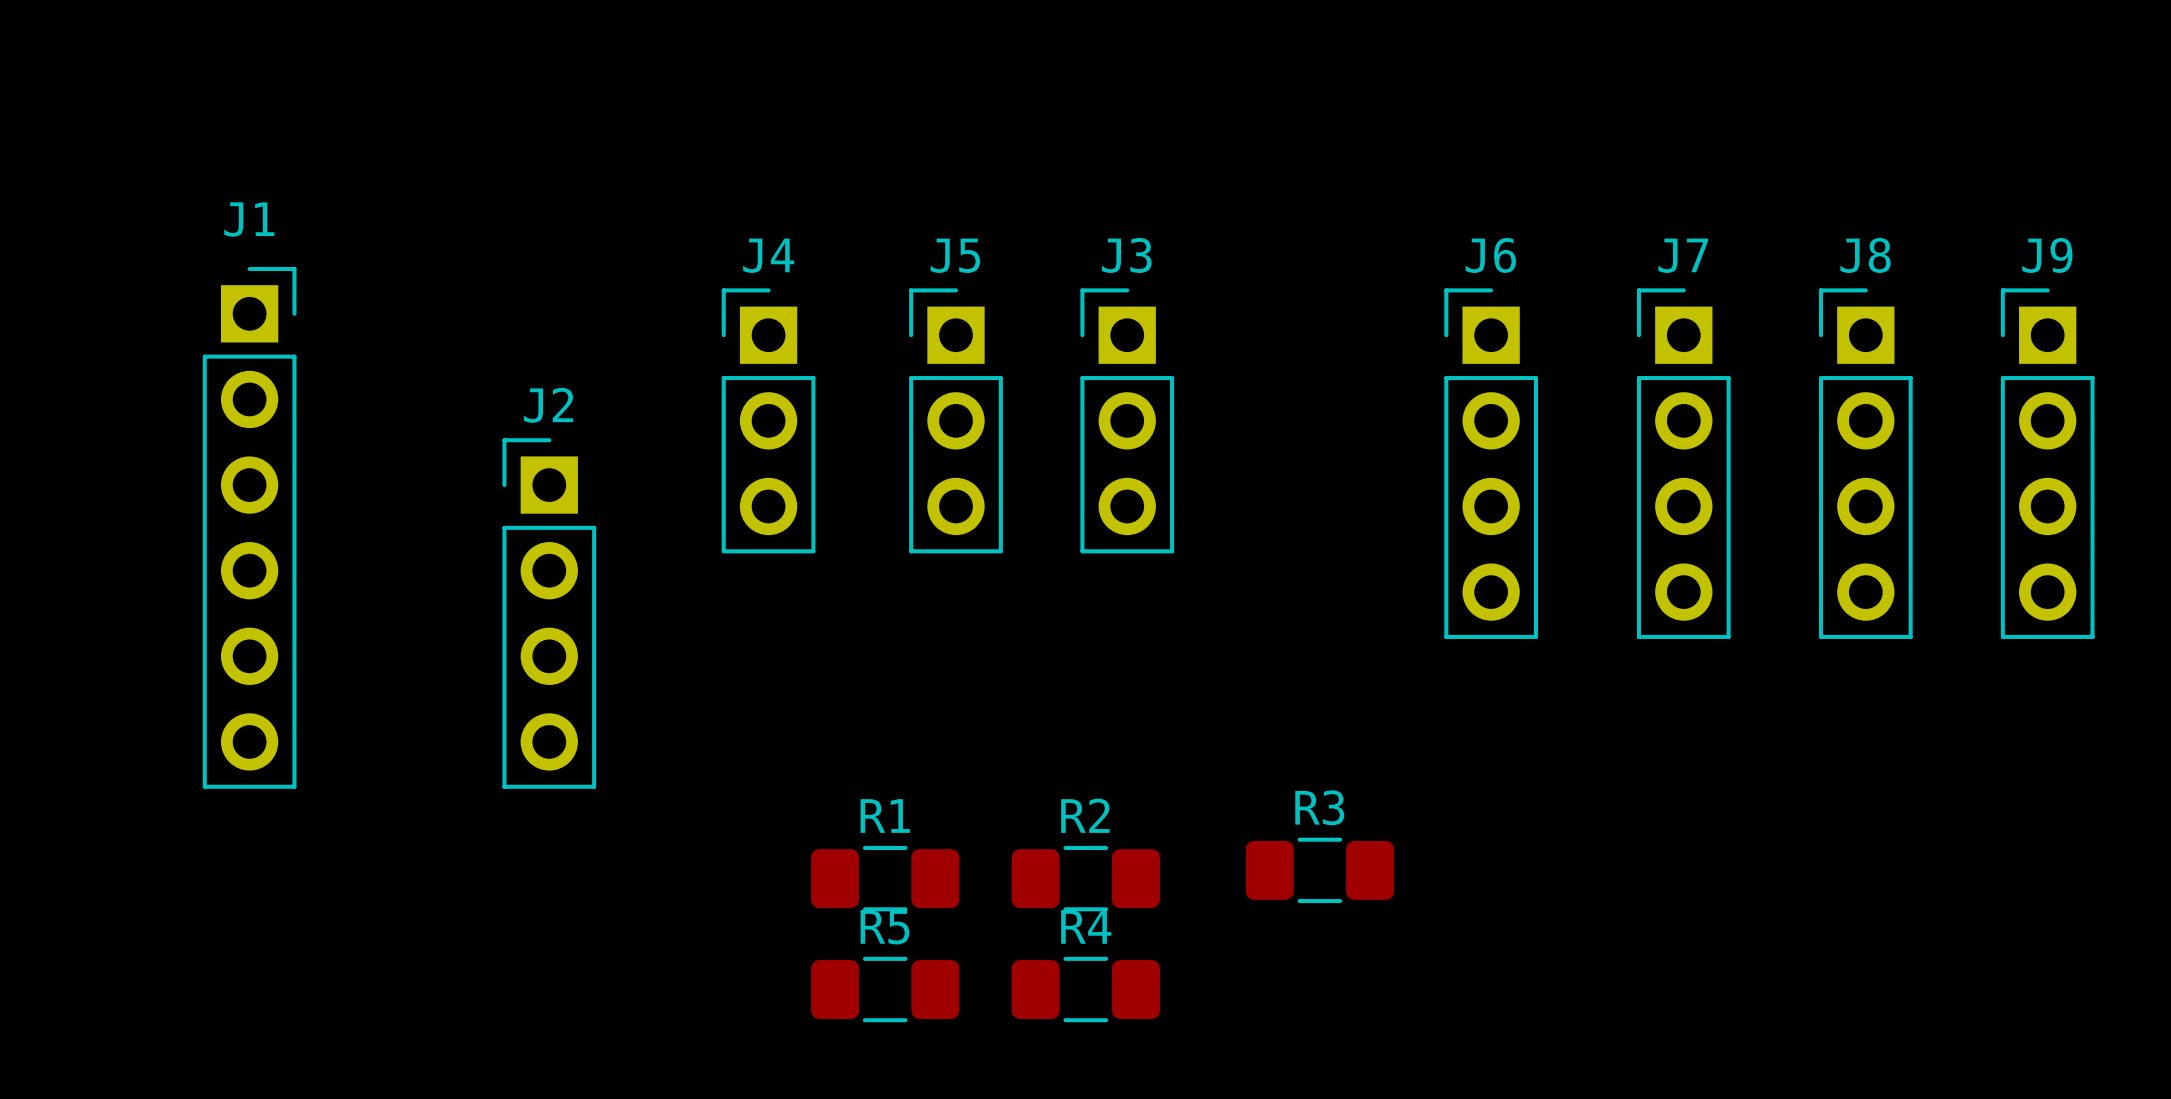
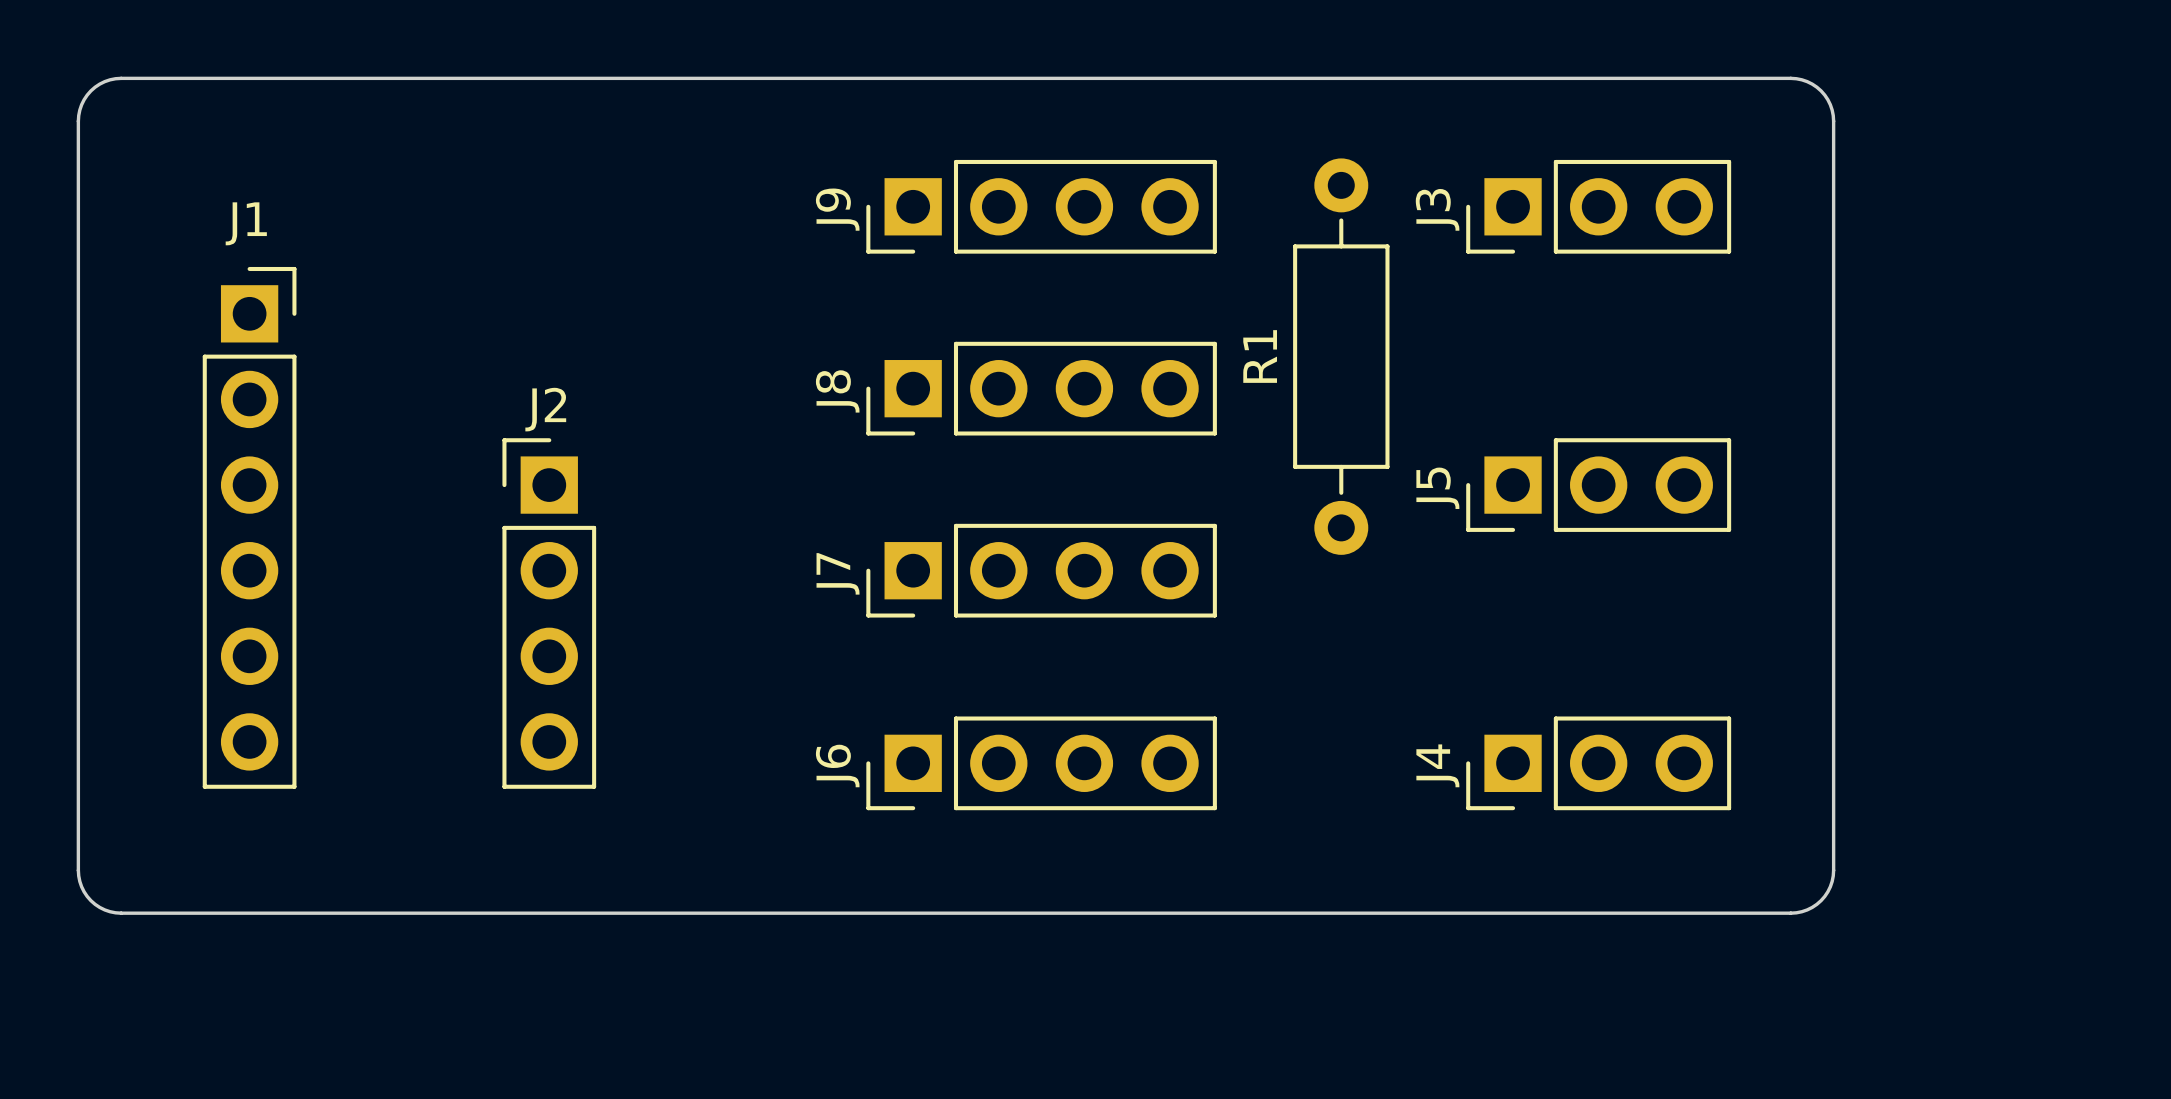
board edge: none -> (121, 78) (1790, 78) (1807, 81) (1824, 95) (1832, 110) (1833, 121) (1833, 870) (1830, 886) (1821, 900) (1812, 907) (1790, 913) (121, 913) (104, 909) (95, 904) (84, 891) (78, 870) (78, 121) (81, 104) (90, 90) (104, 81) (121, 78)
J4 rotation: 0° (768, 420) -> 90° counterclockwise (1598, 763)
J4 position: (768, 420) -> (1598, 763)
J5 rotation: 0° (955, 420) -> 90° counterclockwise (1598, 485)
J5 position: (955, 420) -> (1598, 485)
J3 rotation: 0° (1127, 420) -> 90° counterclockwise (1598, 206)
J3 position: (1127, 420) -> (1598, 206)
J6 rotation: 0° (1491, 463) -> 90° counterclockwise (1041, 763)
J6 position: (1491, 463) -> (1041, 763)
J7 rotation: 0° (1683, 463) -> 90° counterclockwise (1041, 570)
J7 position: (1683, 463) -> (1041, 570)
J8 rotation: 0° (1865, 463) -> 90° counterclockwise (1041, 388)
J8 position: (1865, 463) -> (1041, 388)
J9 rotation: 0° (2047, 463) -> 90° counterclockwise (1041, 206)
J9 position: (2047, 463) -> (1041, 206)
R1 name position: R1 (885, 816) -> R1 (1260, 356)
R1 footprint: [811, 845, 960, 912] -> [1293, 158, 1390, 555]
R3: (1319, 870) -> none
R2: (1085, 878) -> none
R5: (885, 989) -> none
R4: (1085, 989) -> none

